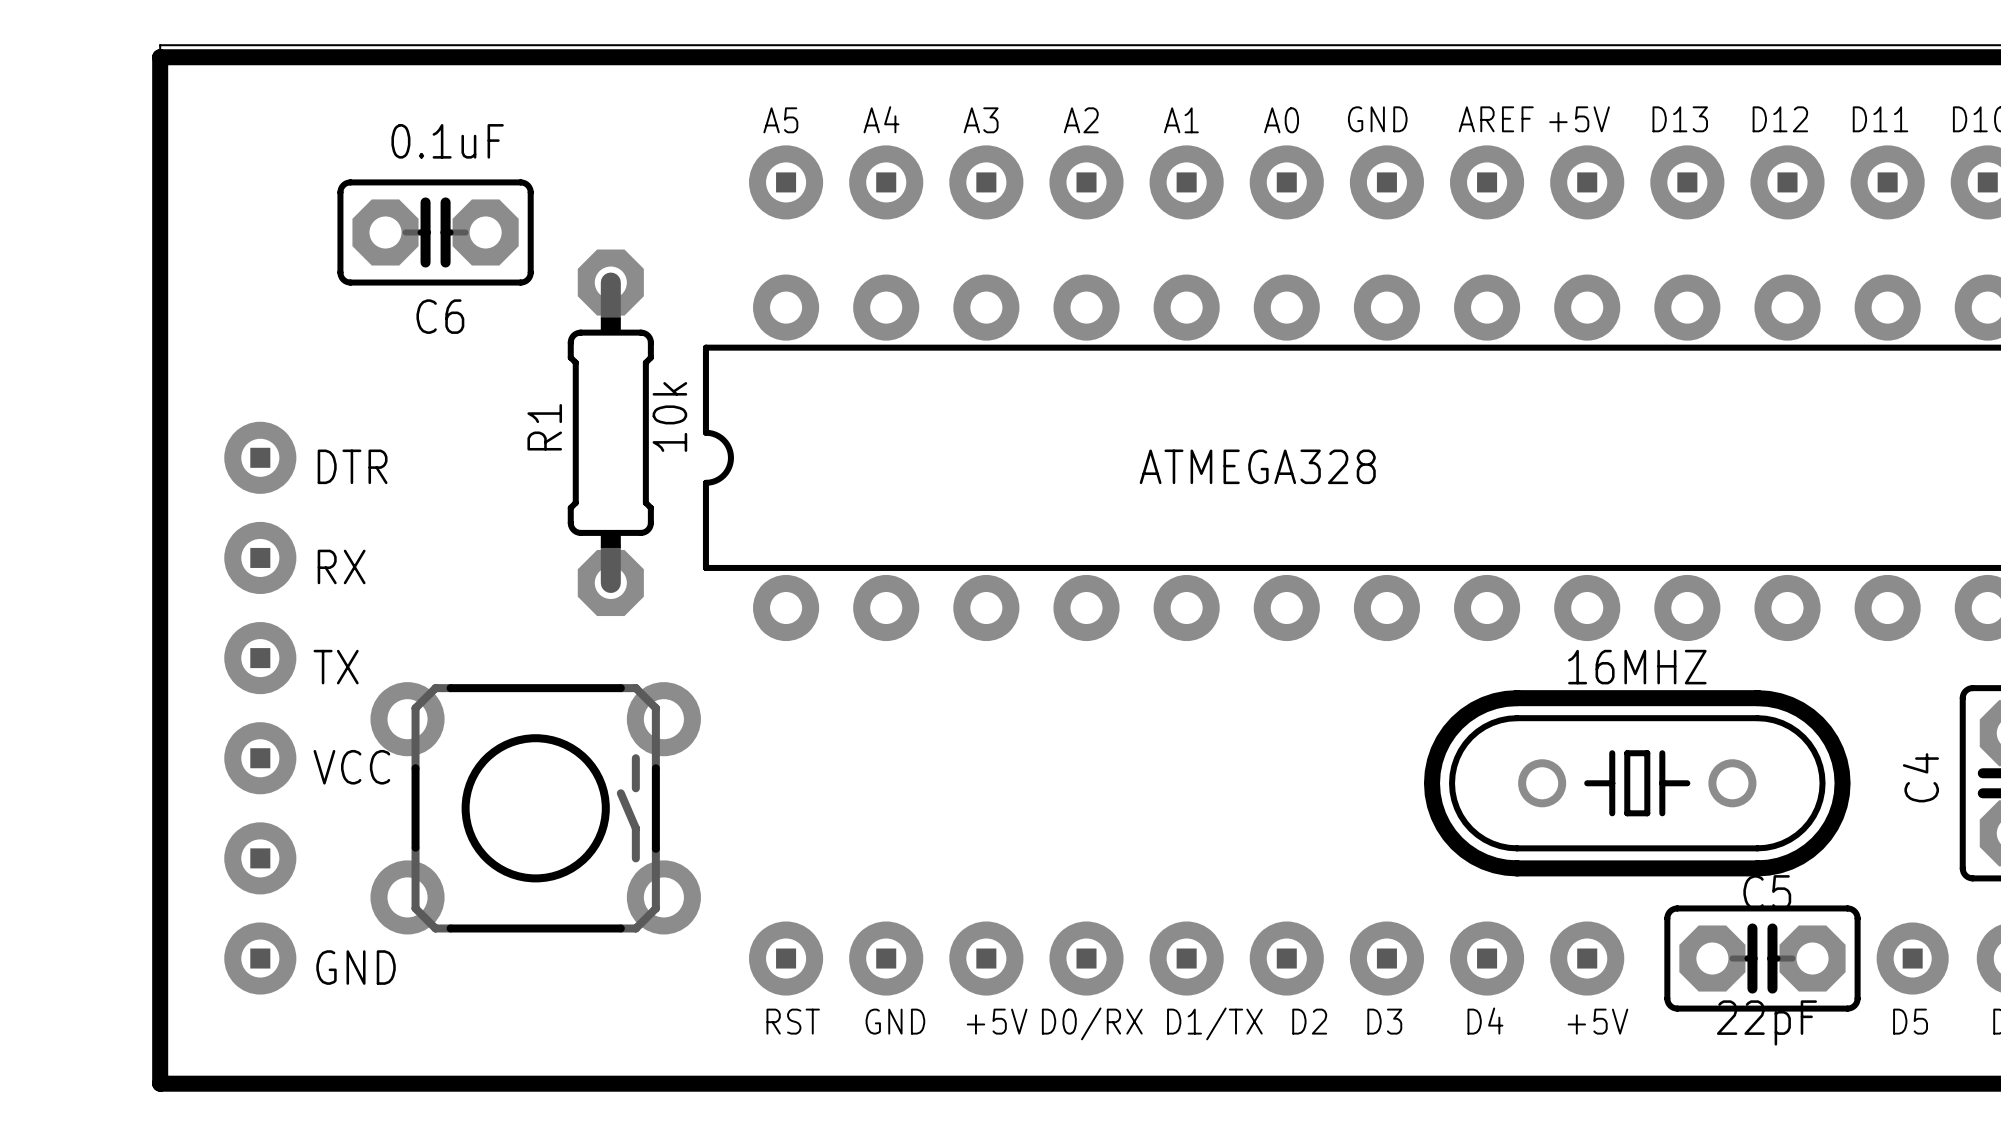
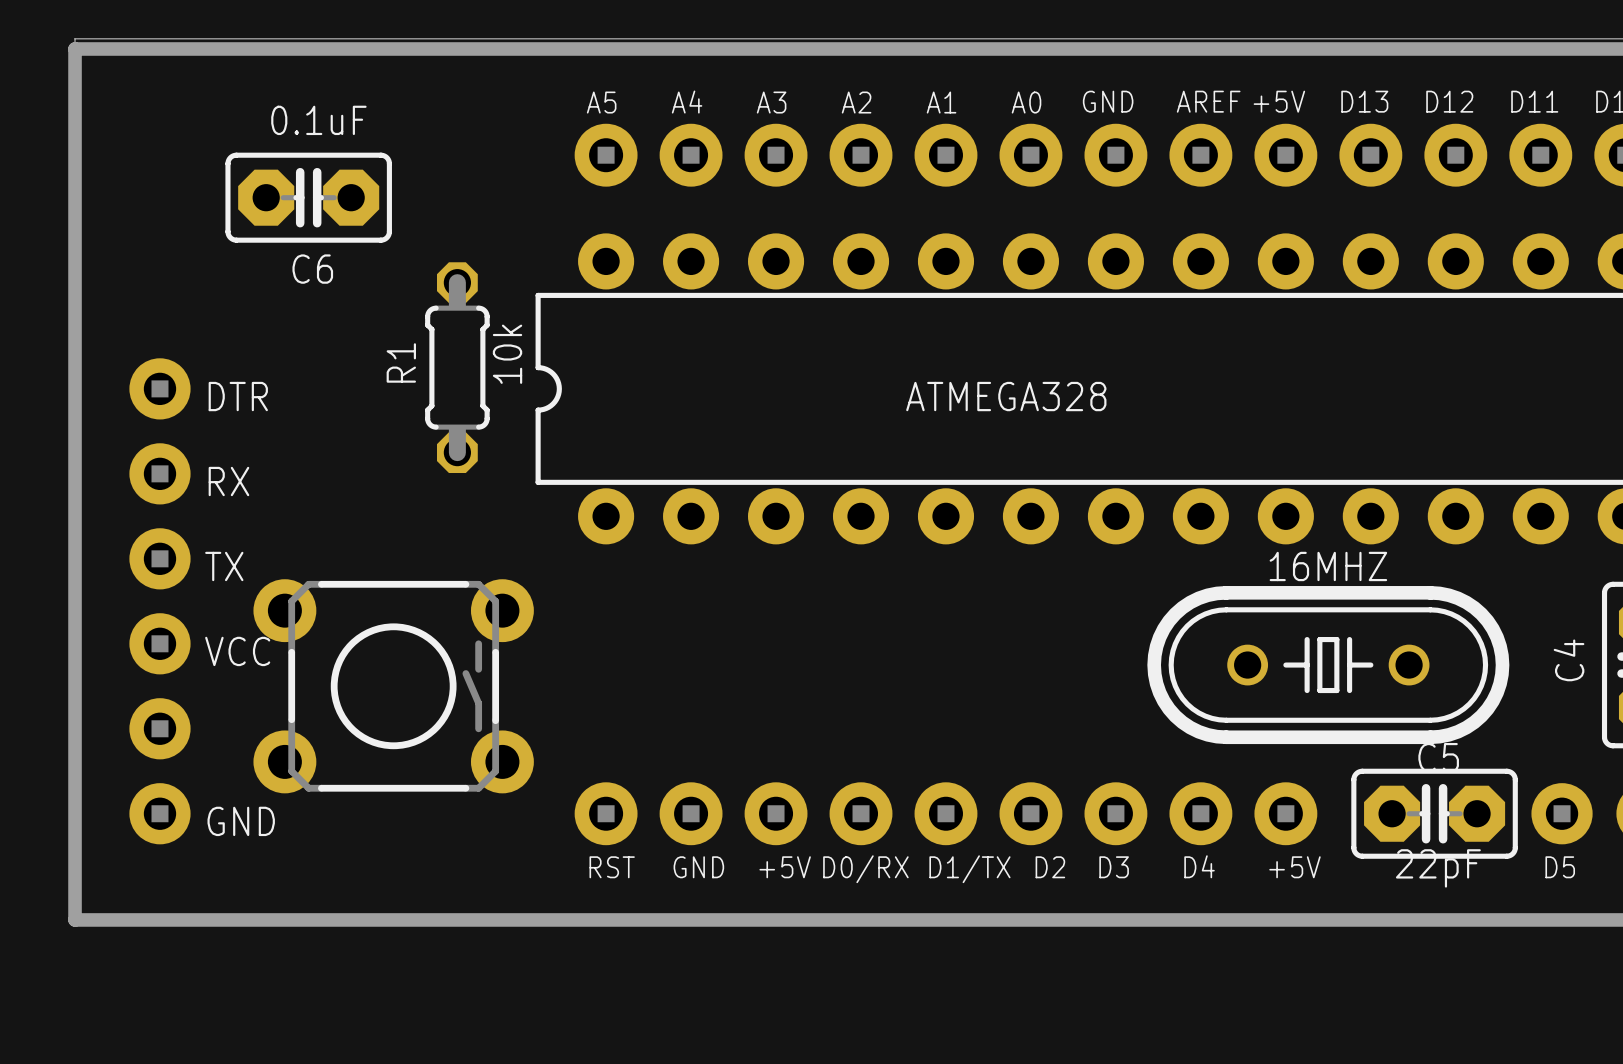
part footprint: [567, 249, 654, 617] -> [425, 262, 490, 474]

